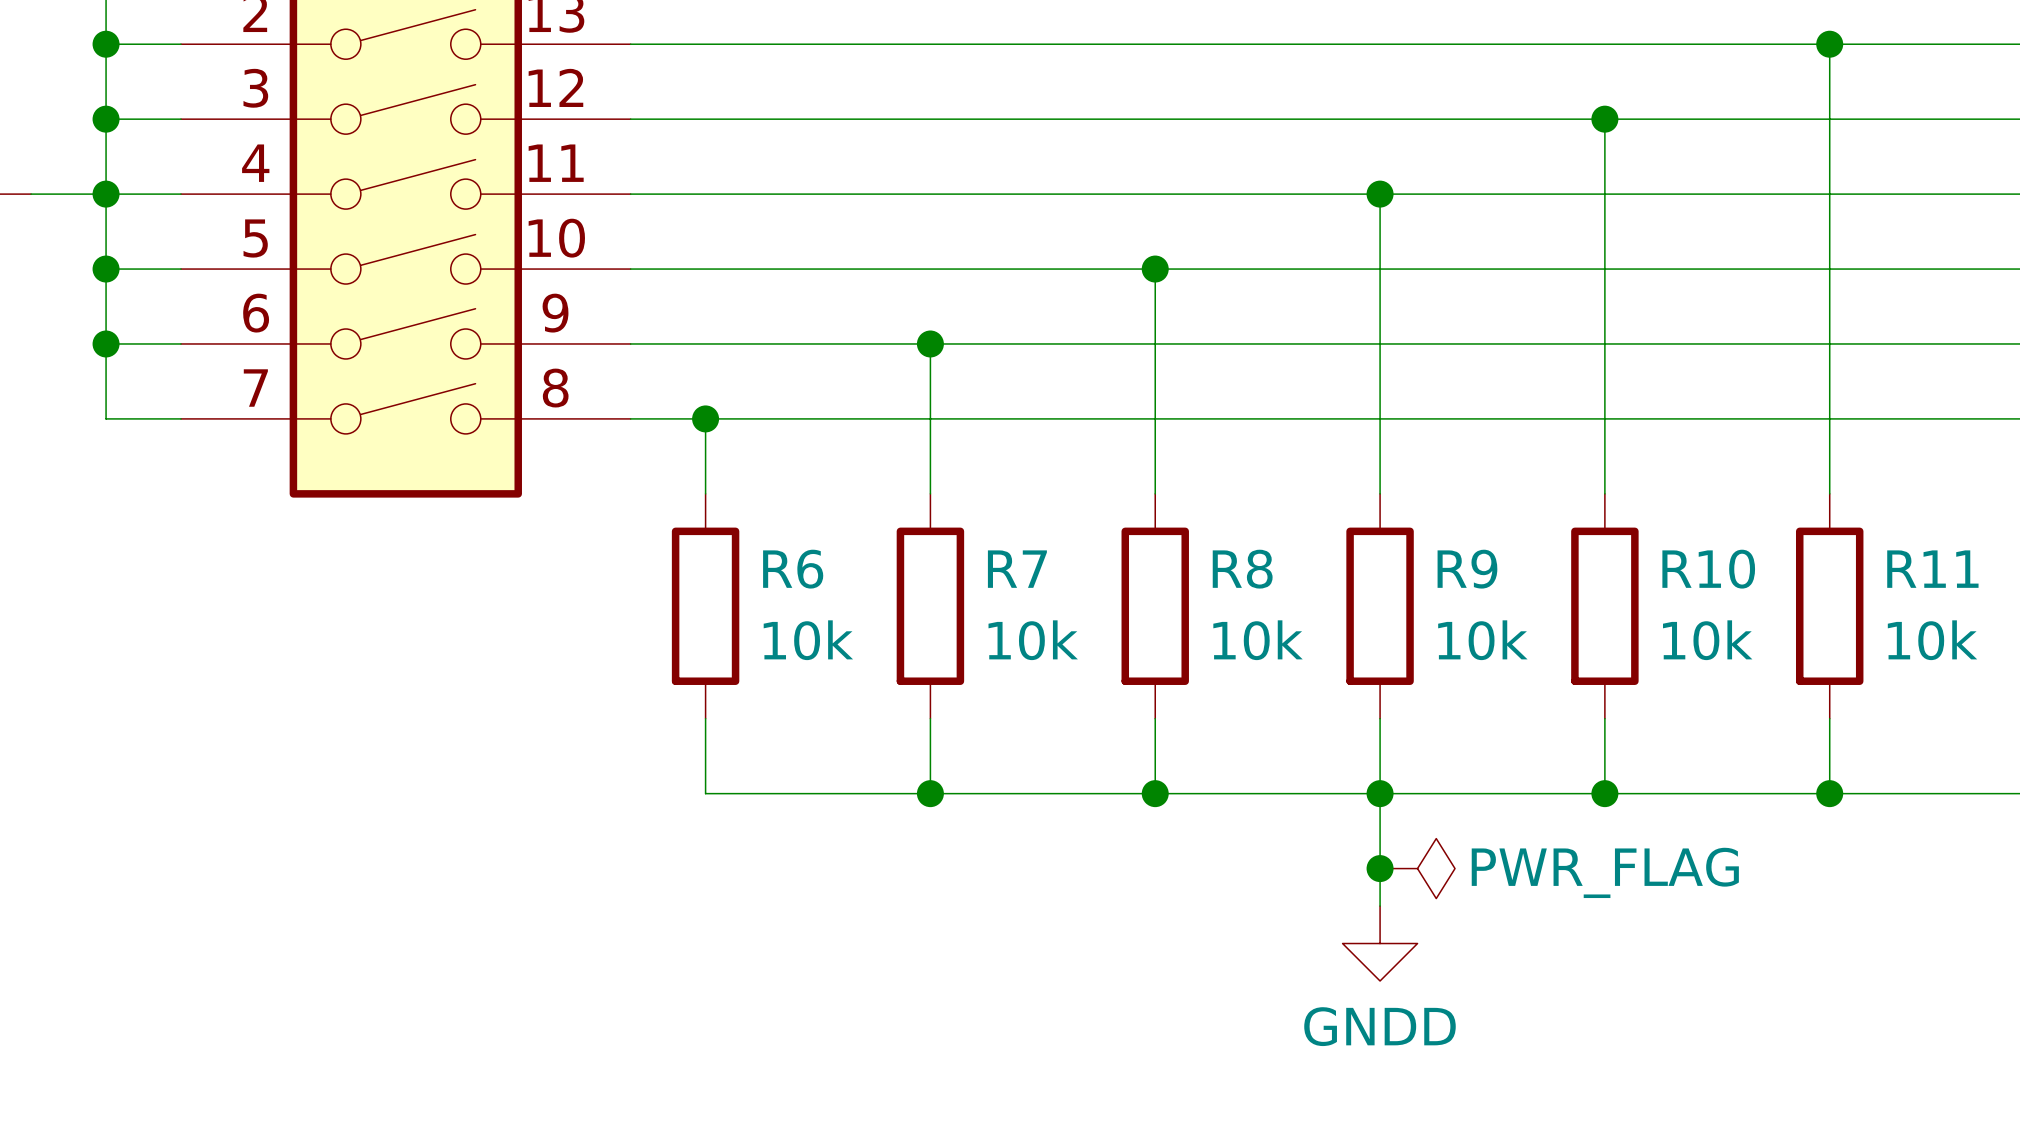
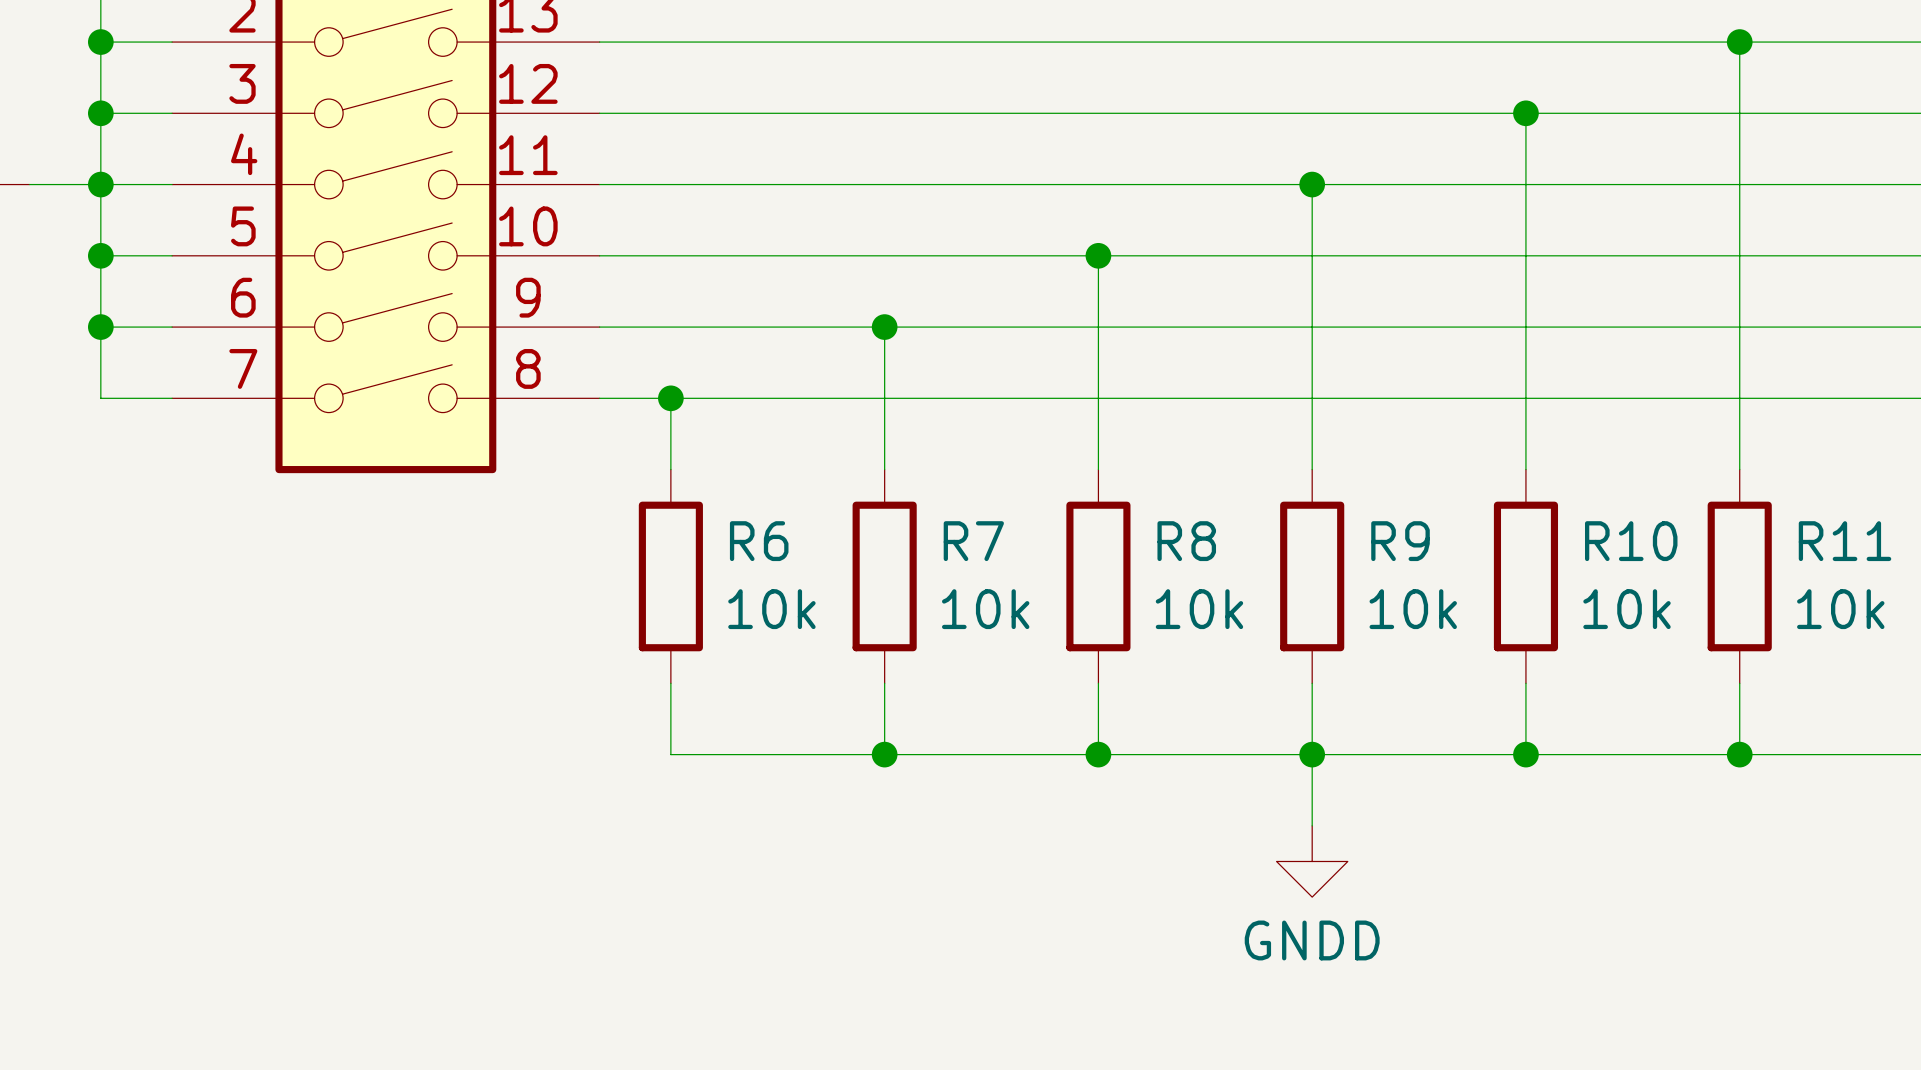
junction: (1380, 868) -> none
power symbol: PWR_FLAG (1417, 868) -> none
power symbol position: GNDD (1380, 943) -> GNDD (1312, 861)

